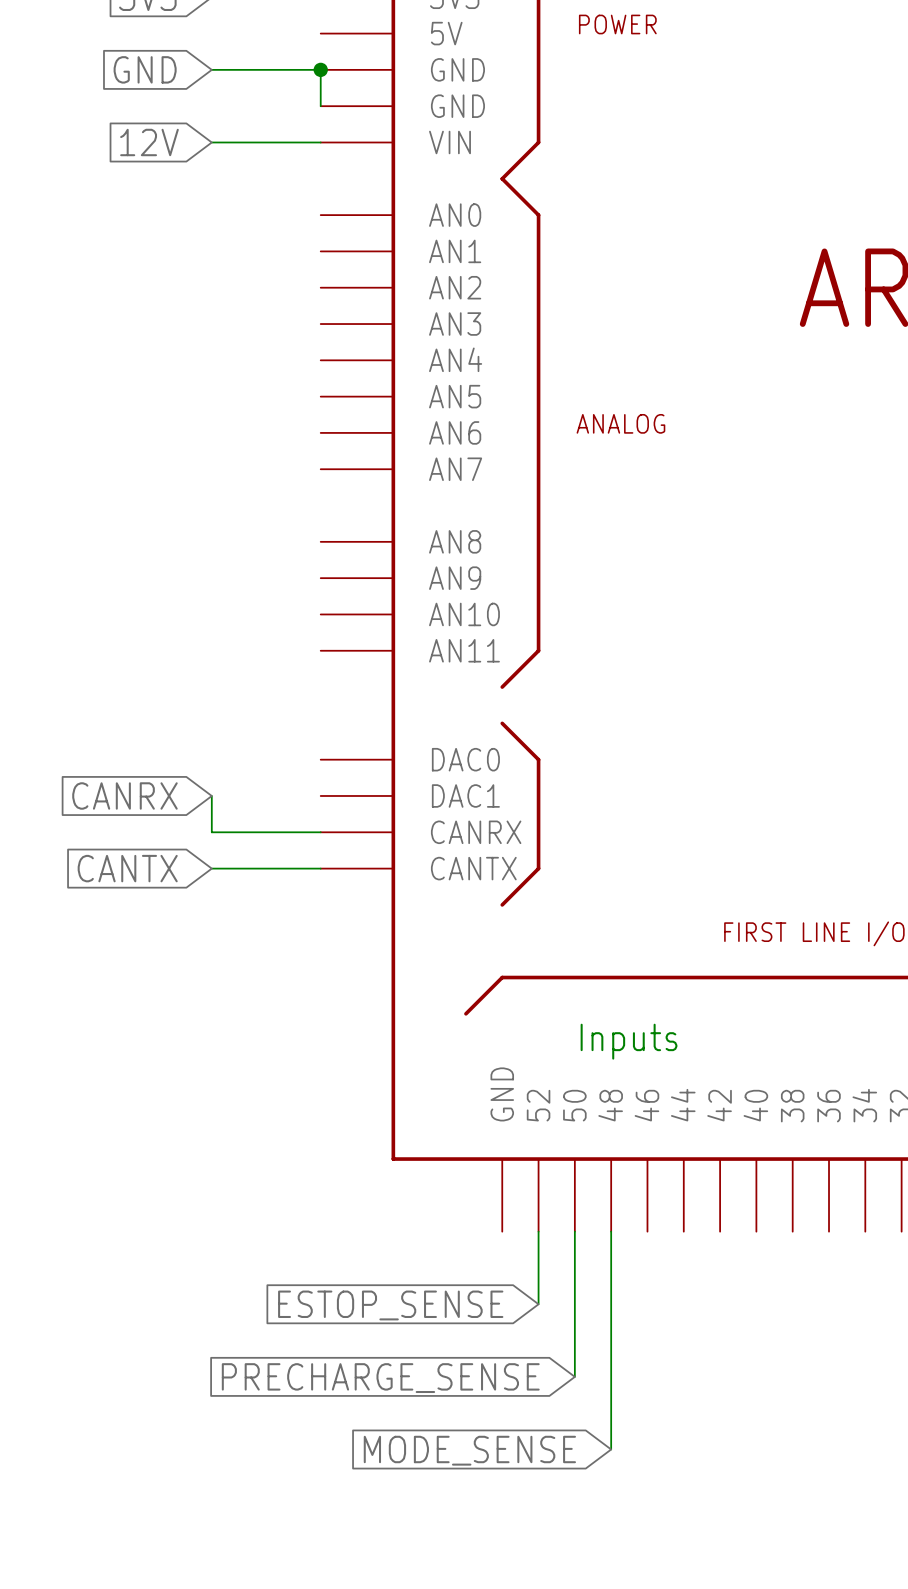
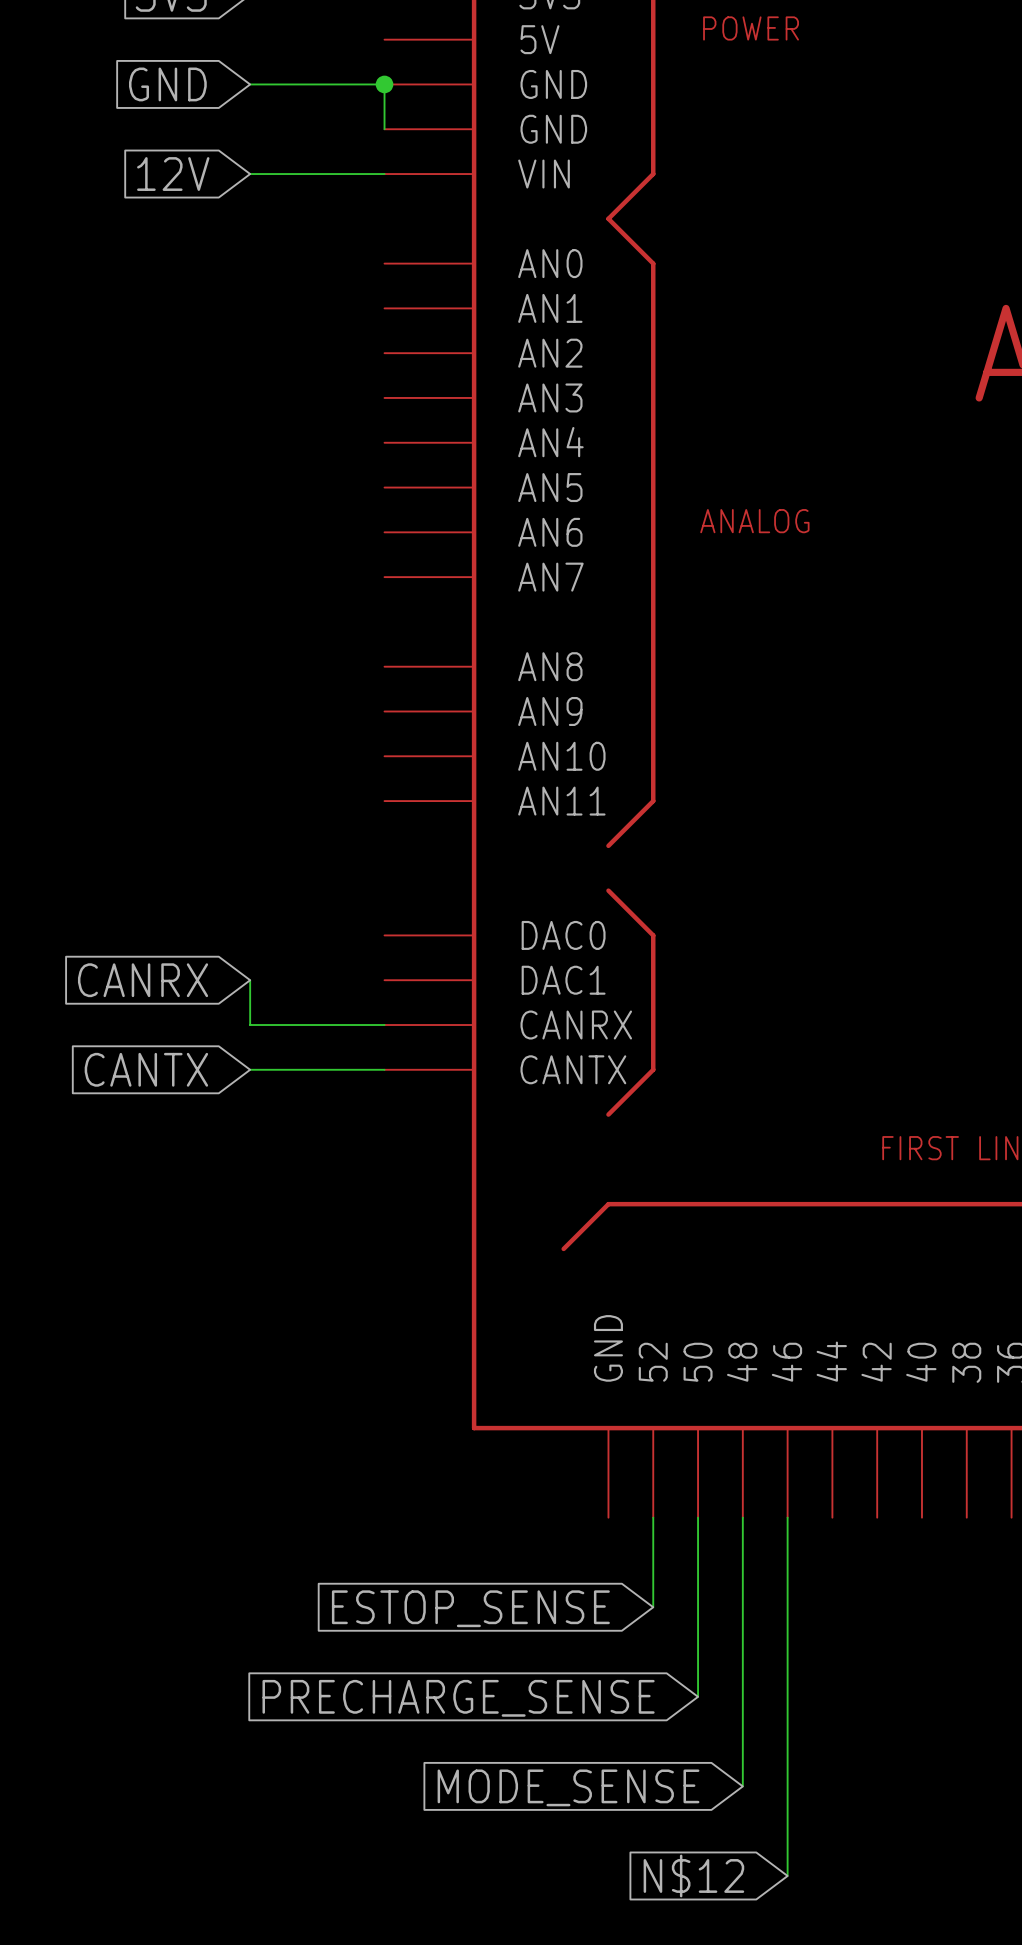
text: Inputs (629, 1041) -> none
wire: none -> (787, 1517) (787, 1875)
global label: none -> N$12 (693, 1875)

